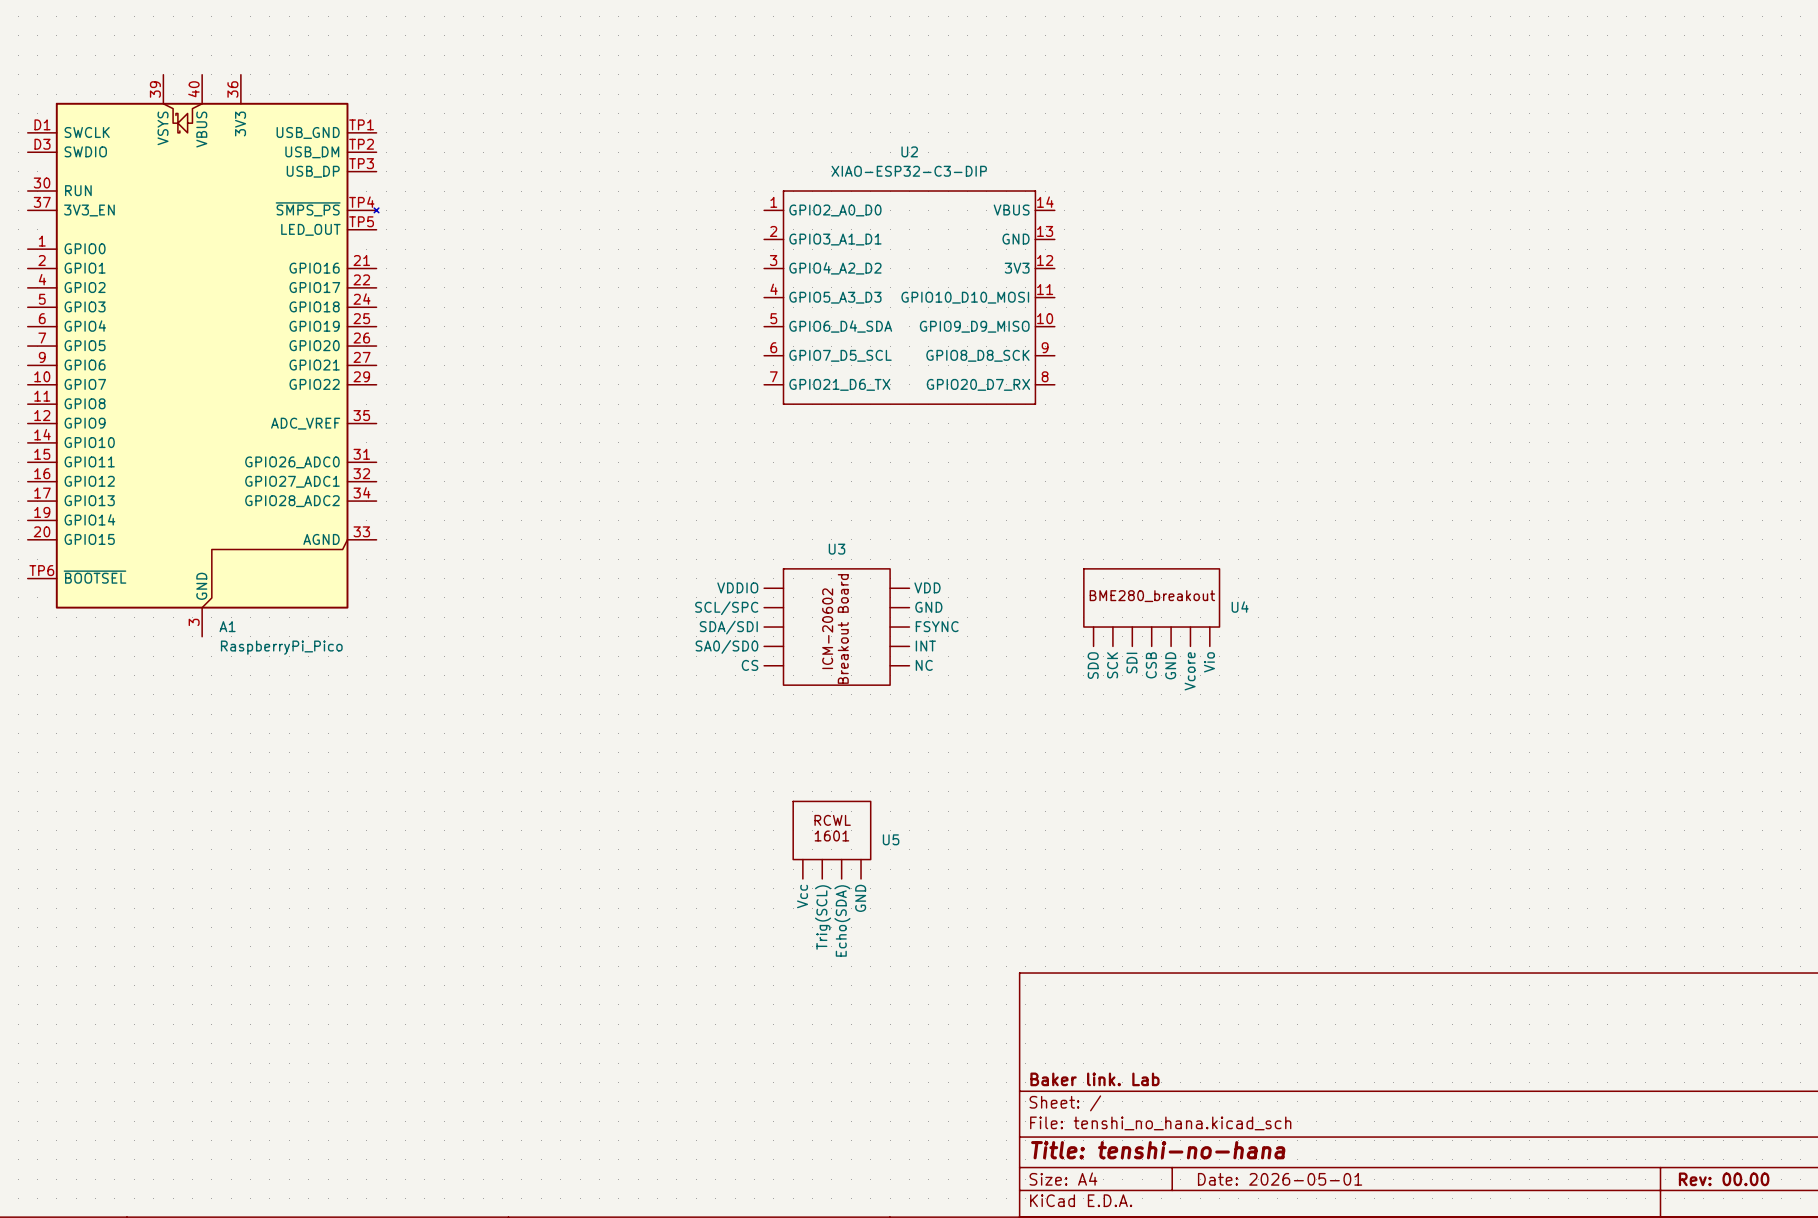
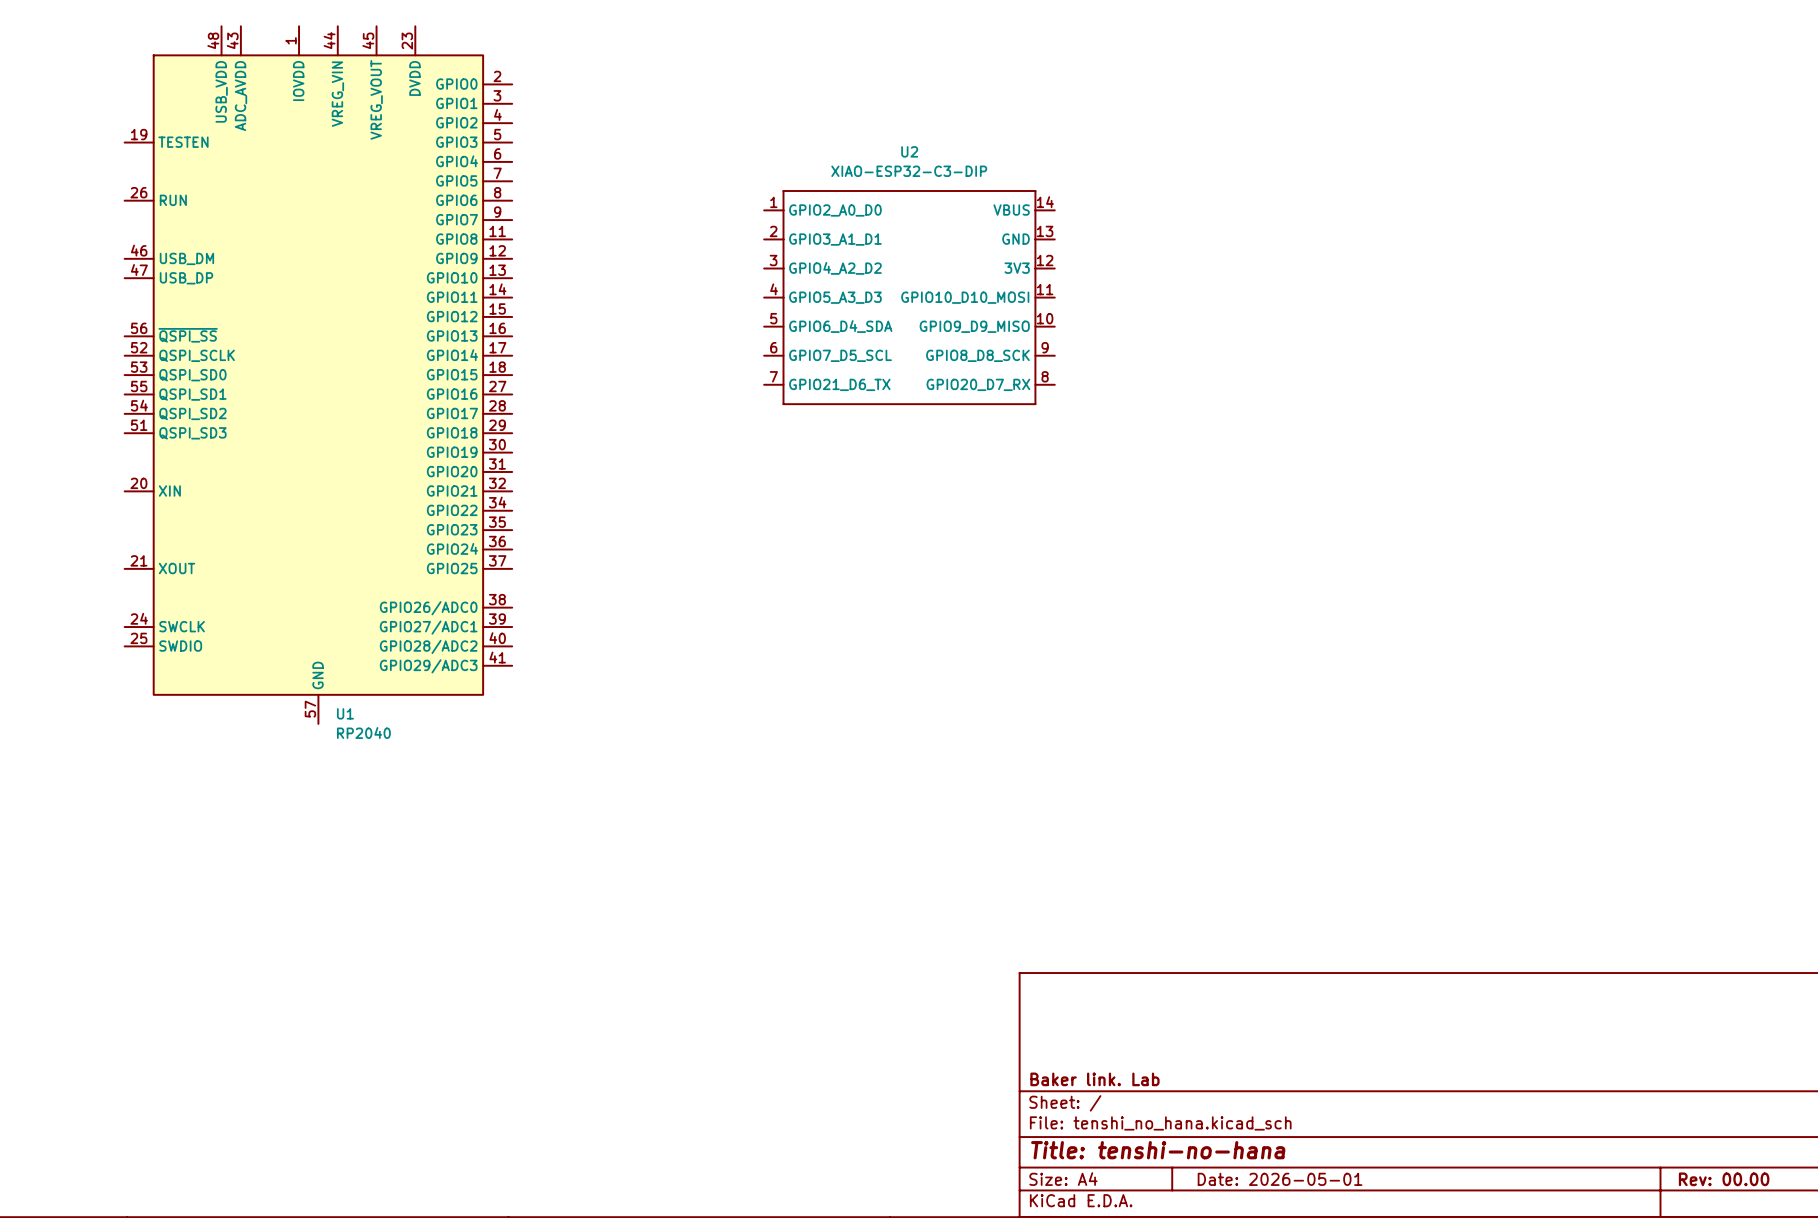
A1: RaspberryPi_Pico (203, 355) -> none
U1: none -> RP2040 (318, 375)
U4: (1151, 607) -> none
U3: (836, 627) -> none
U5: (831, 840) -> none

